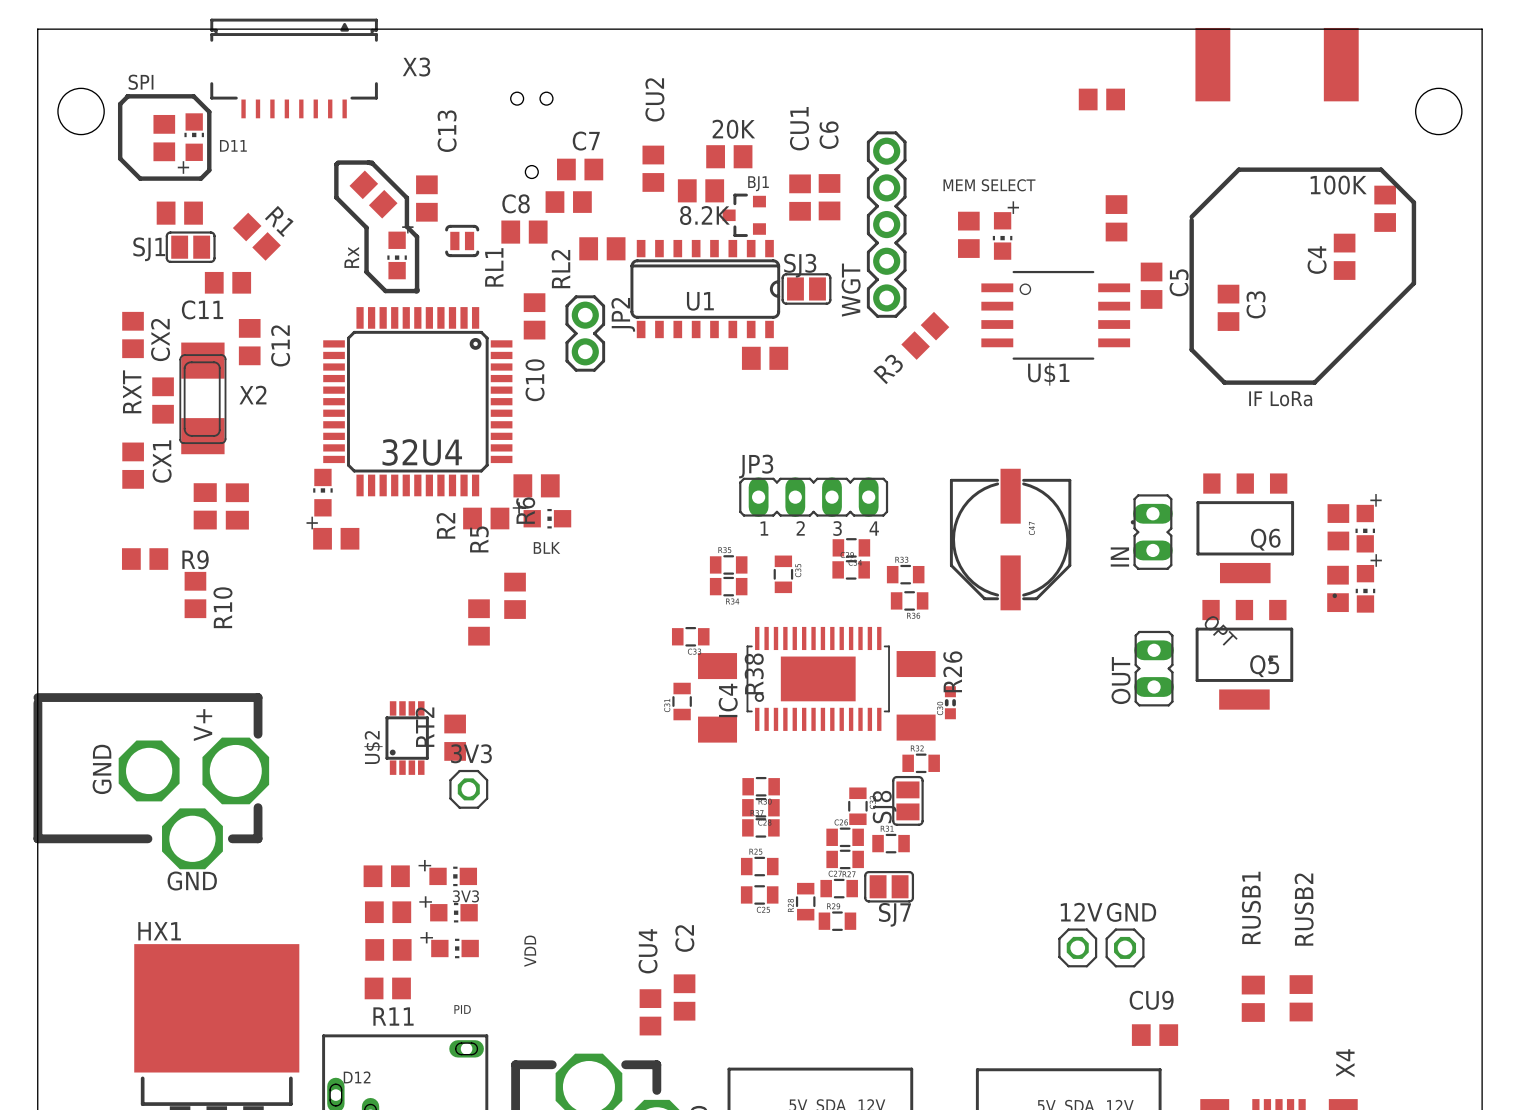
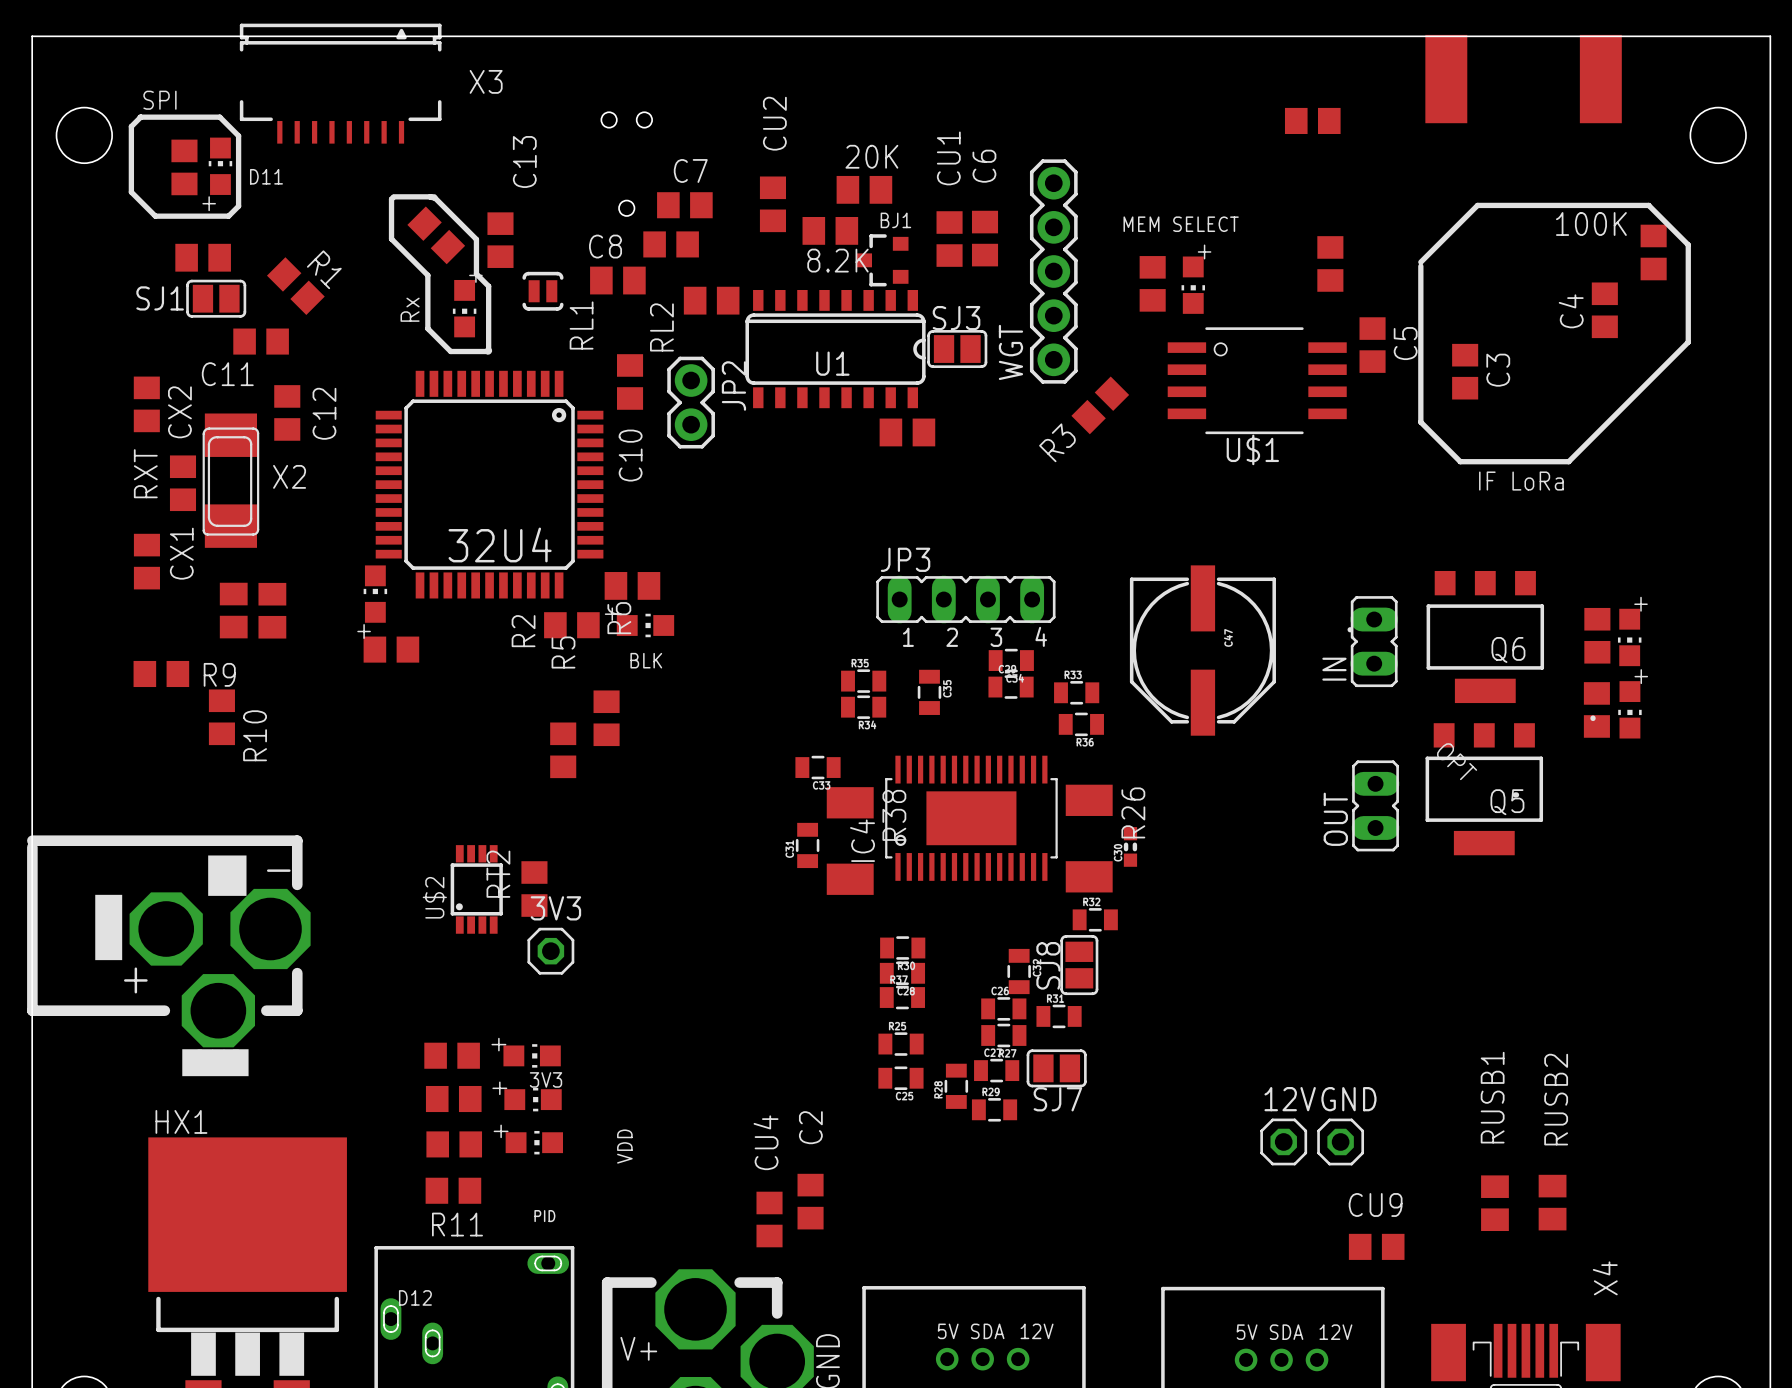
drawing: none -> [208, 855, 247, 896]
text: none -> - (278, 870)
drawing: none -> [95, 894, 123, 961]
text: none -> + (135, 980)
drawing: none -> [182, 1049, 249, 1077]

